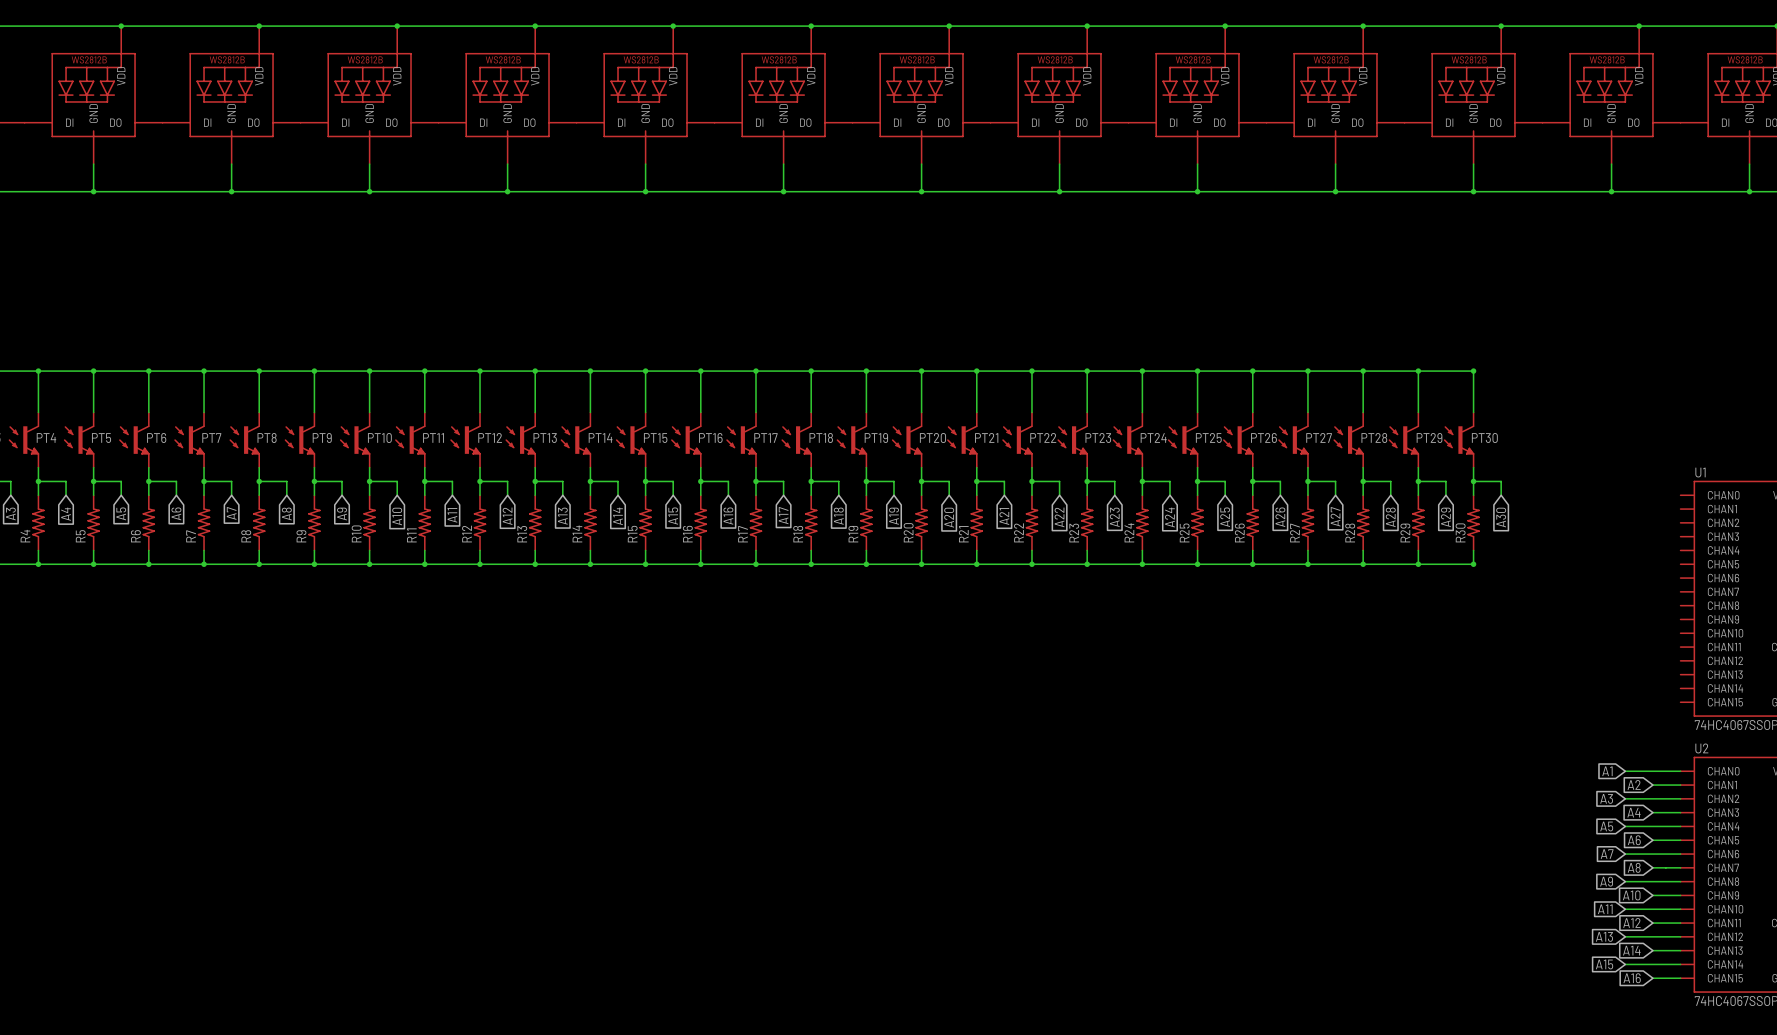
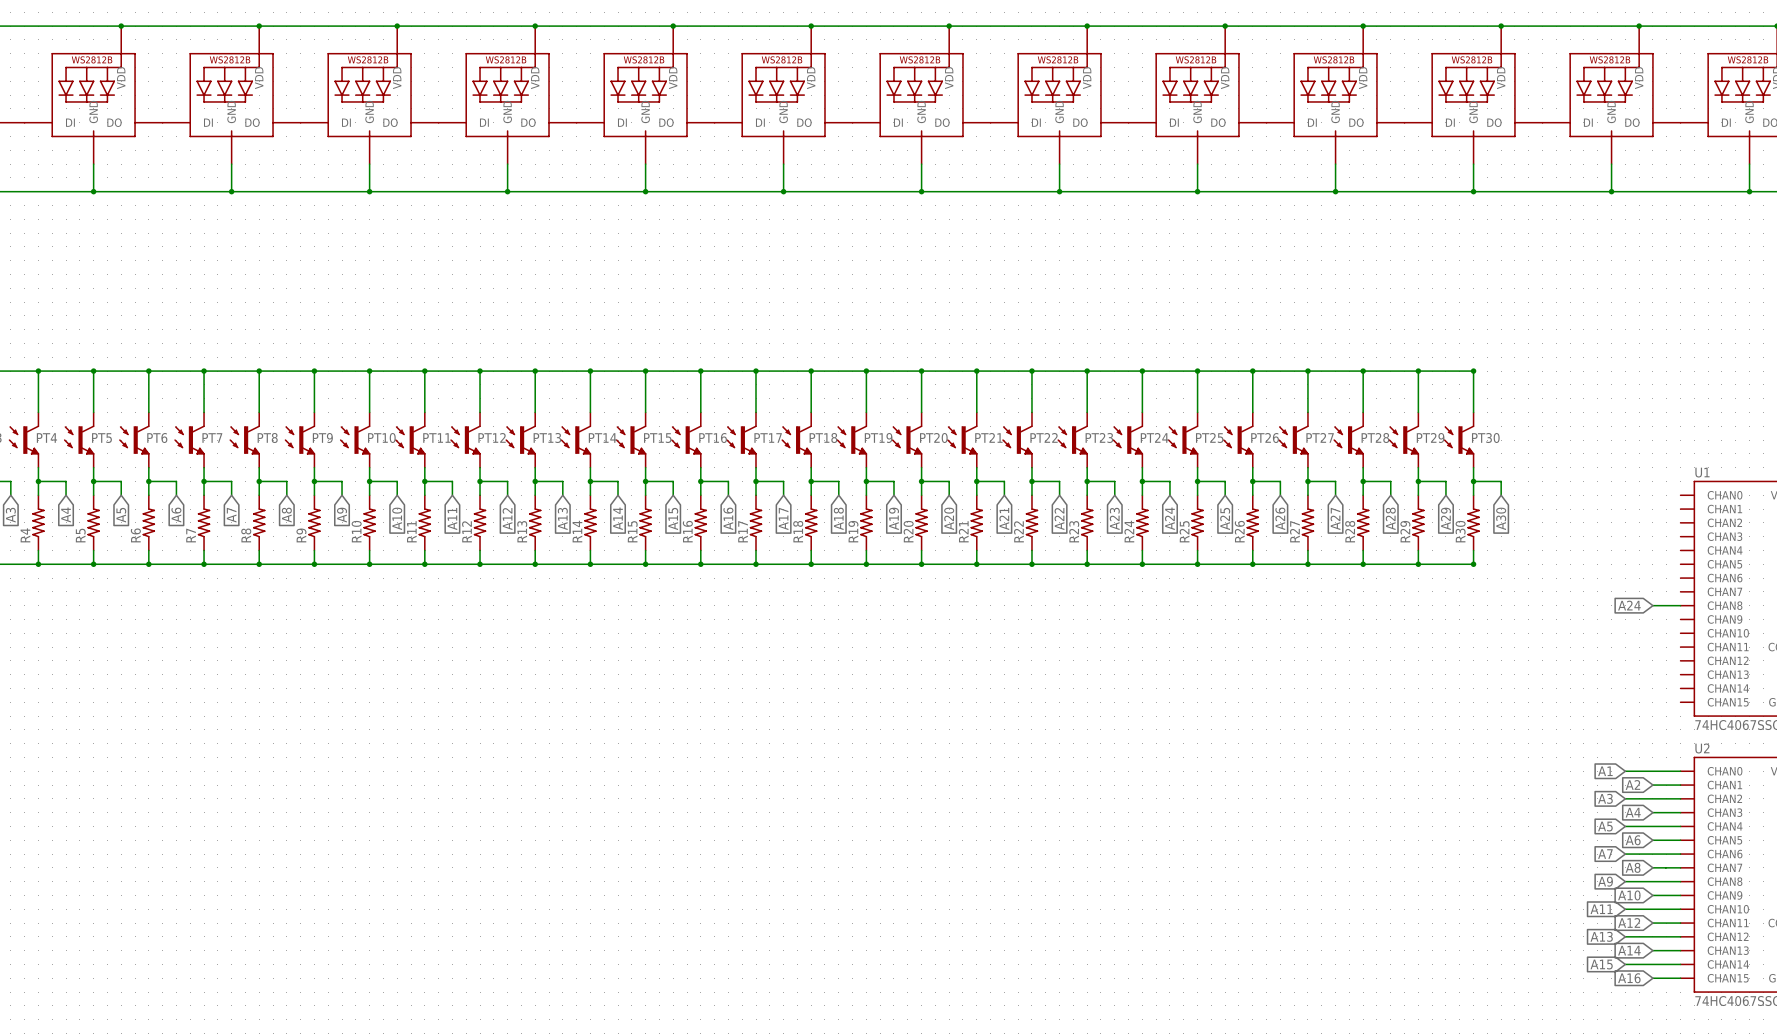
global label: none -> A24 (1629, 605)
wire: none -> (1652, 605) (1680, 605)

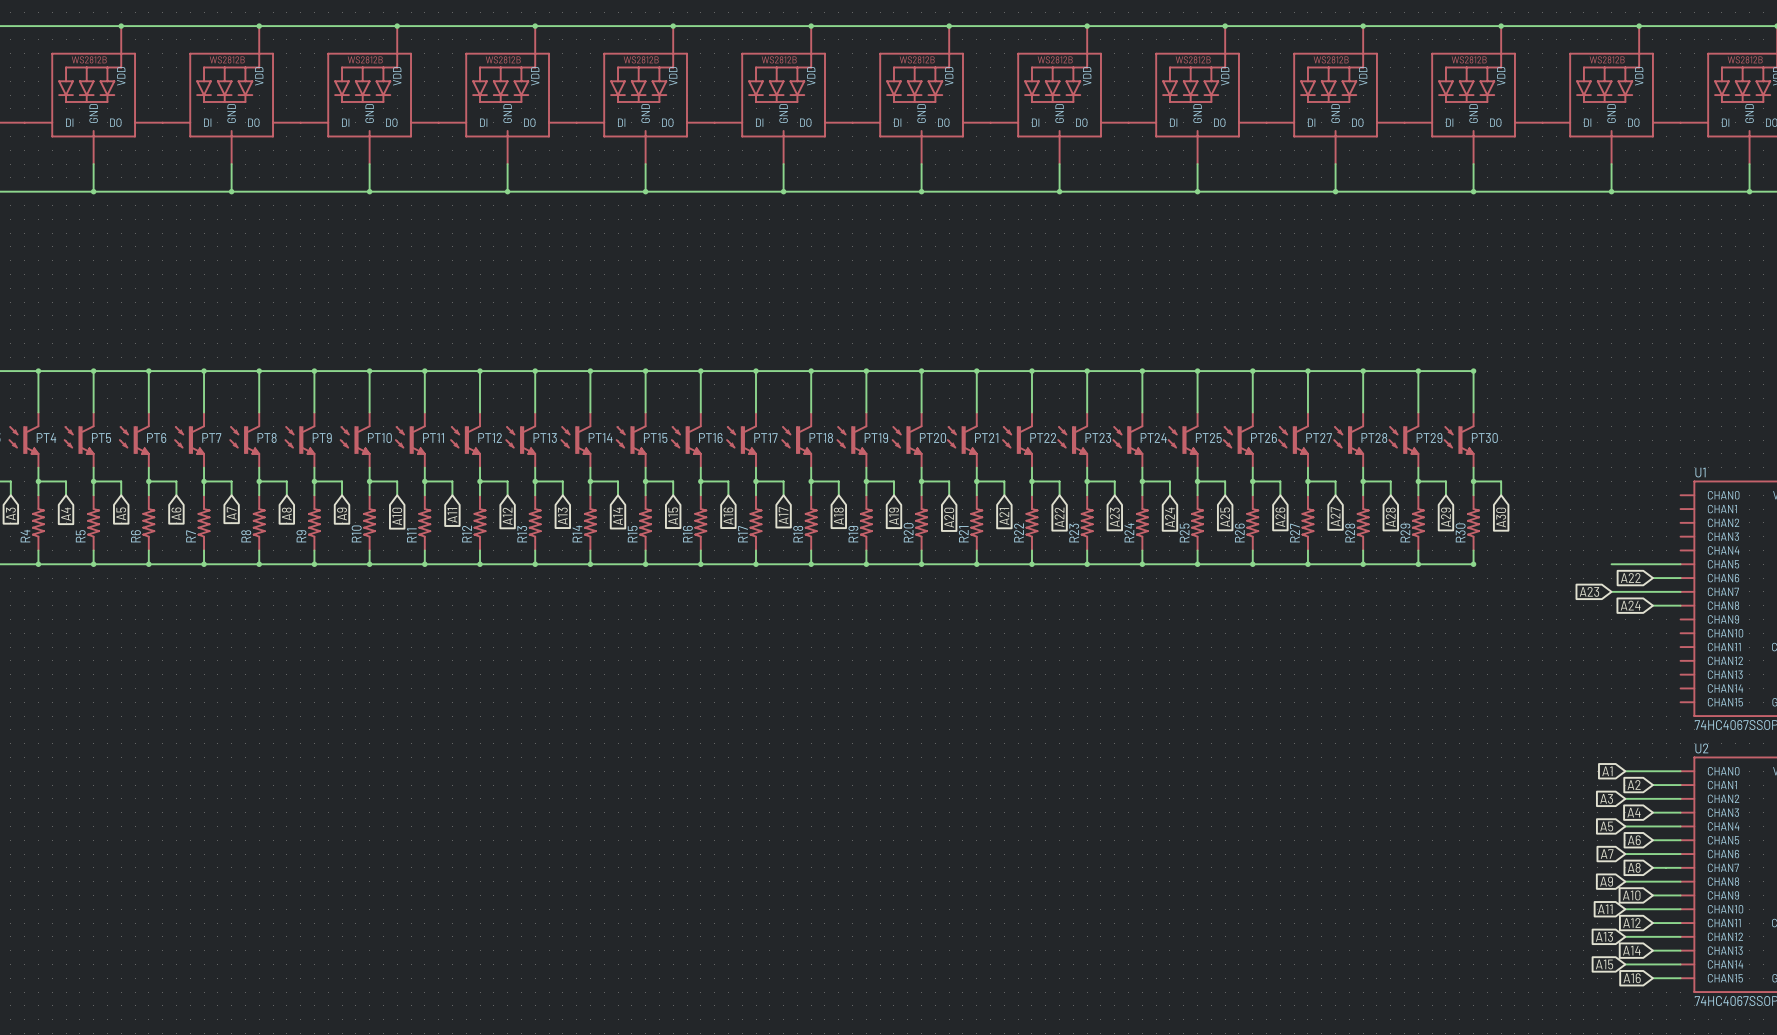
wire: none -> (1611, 564) (1680, 564)
global label: none -> A22 (1630, 578)
wire: none -> (1652, 578) (1680, 578)
global label: none -> A23 (1589, 591)
wire: none -> (1611, 591) (1680, 591)

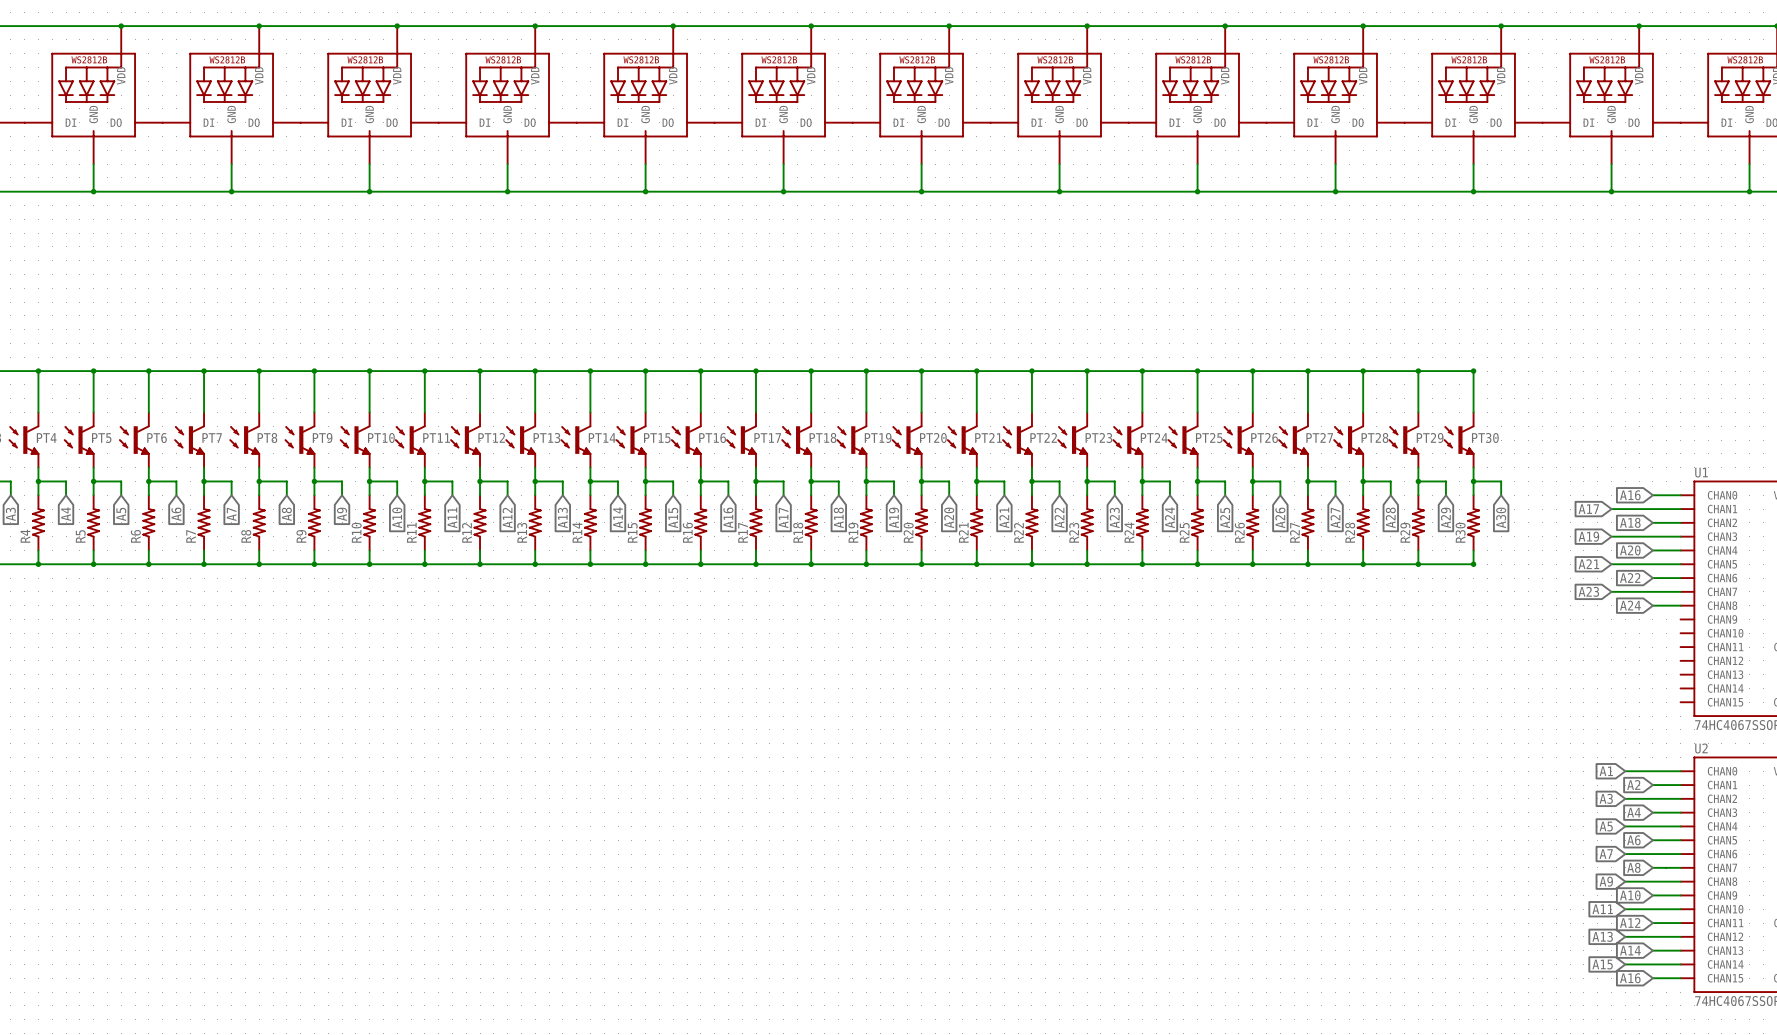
global label: none -> A16 (1630, 495)
wire: none -> (1652, 495) (1680, 495)
global label: none -> A17 (1588, 509)
wire: none -> (1611, 509) (1680, 509)
global label: none -> A18 (1630, 522)
wire: none -> (1652, 522) (1680, 522)
global label: none -> A19 (1588, 536)
wire: none -> (1611, 536) (1680, 536)
global label: none -> A20 (1630, 550)
wire: none -> (1652, 550) (1680, 550)
global label: none -> A21 (1588, 564)

